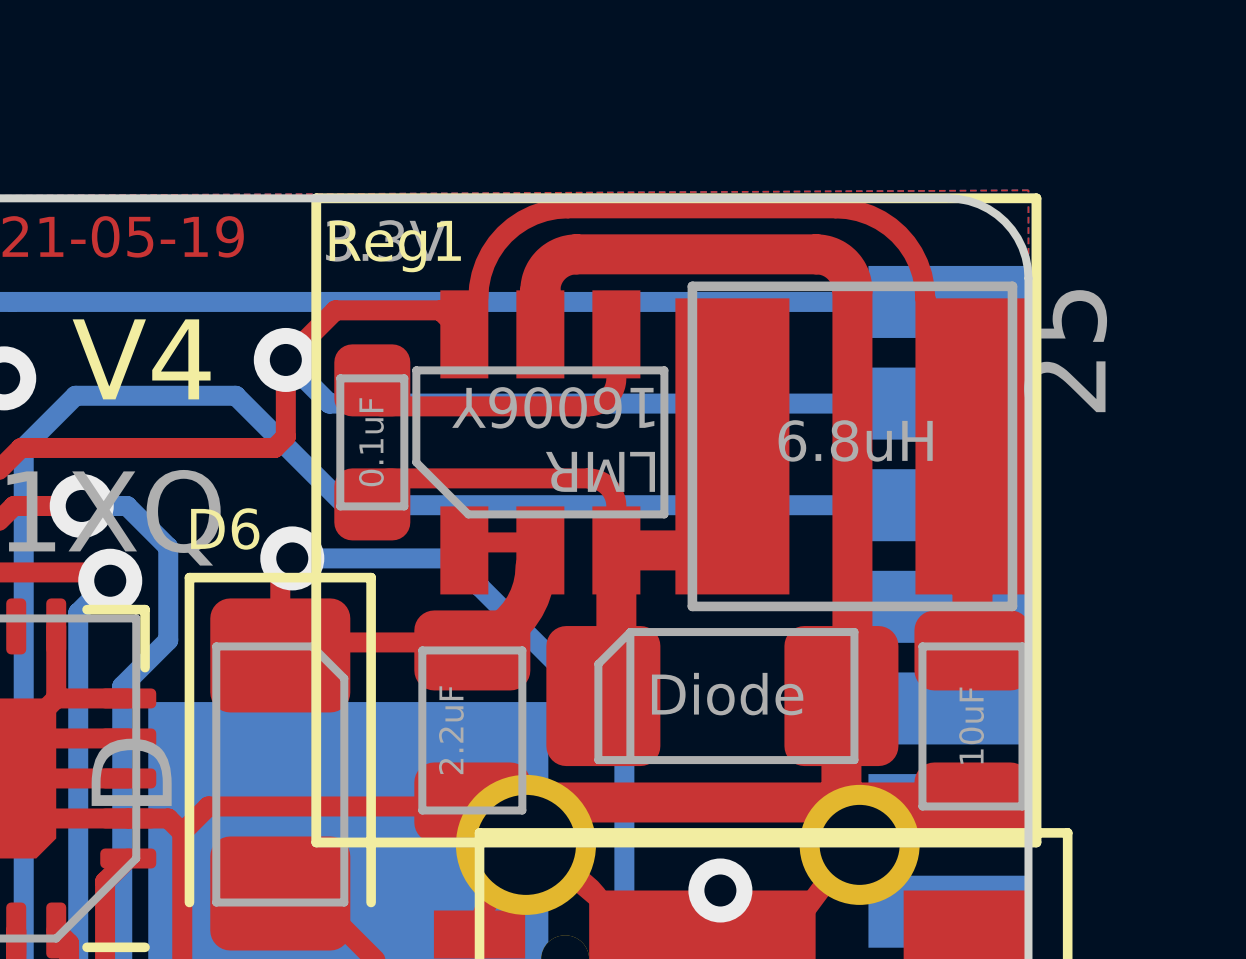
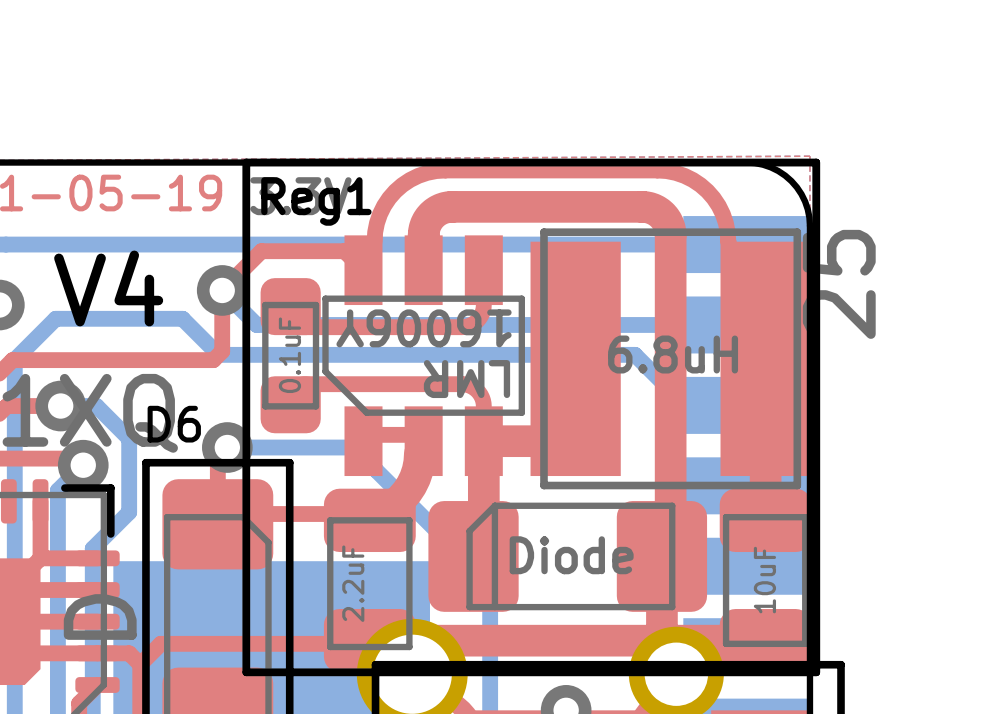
bottom track: (281, 441) (345, 505) (871, 505) -> (218, 354) (634, 354) (685, 405)

